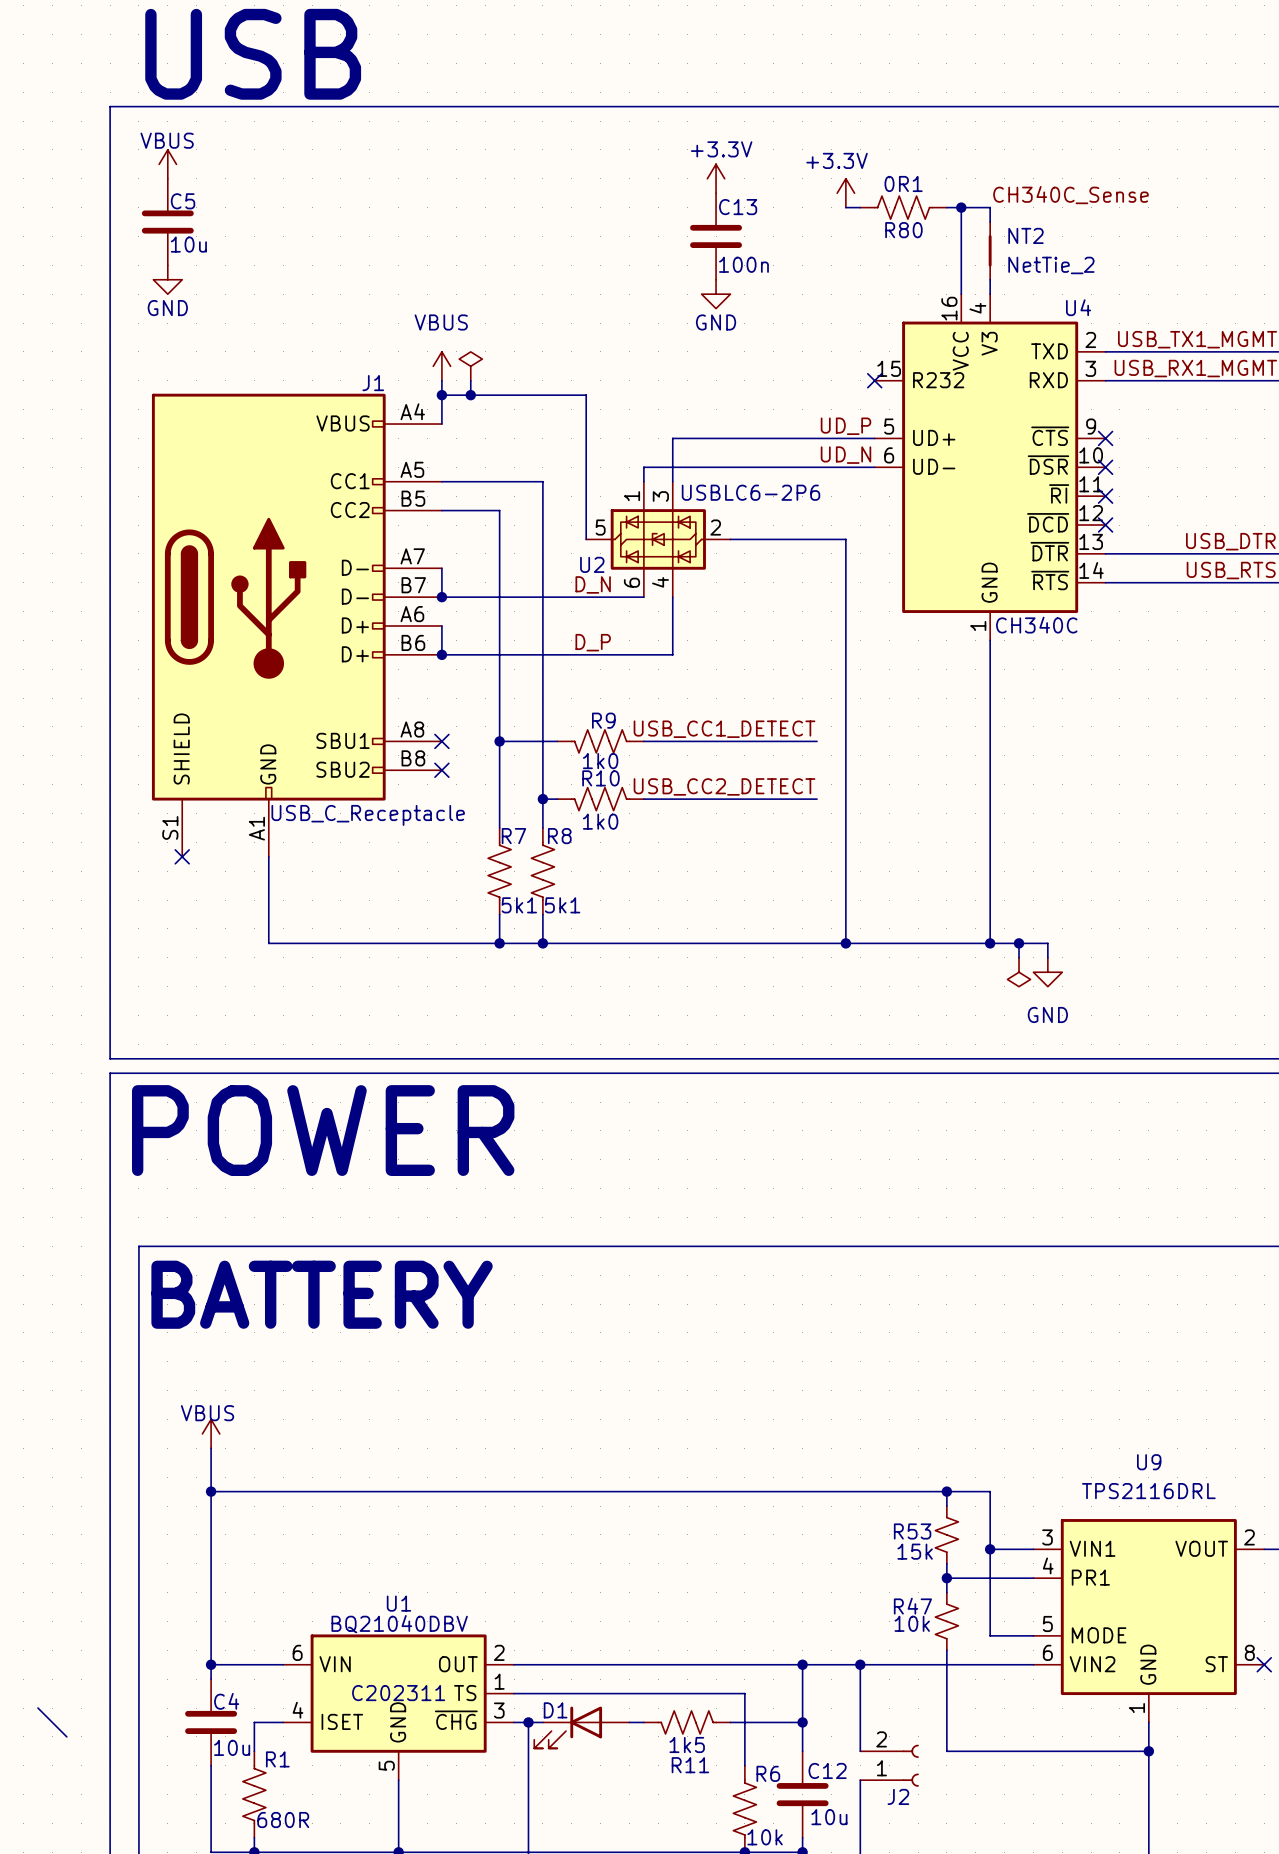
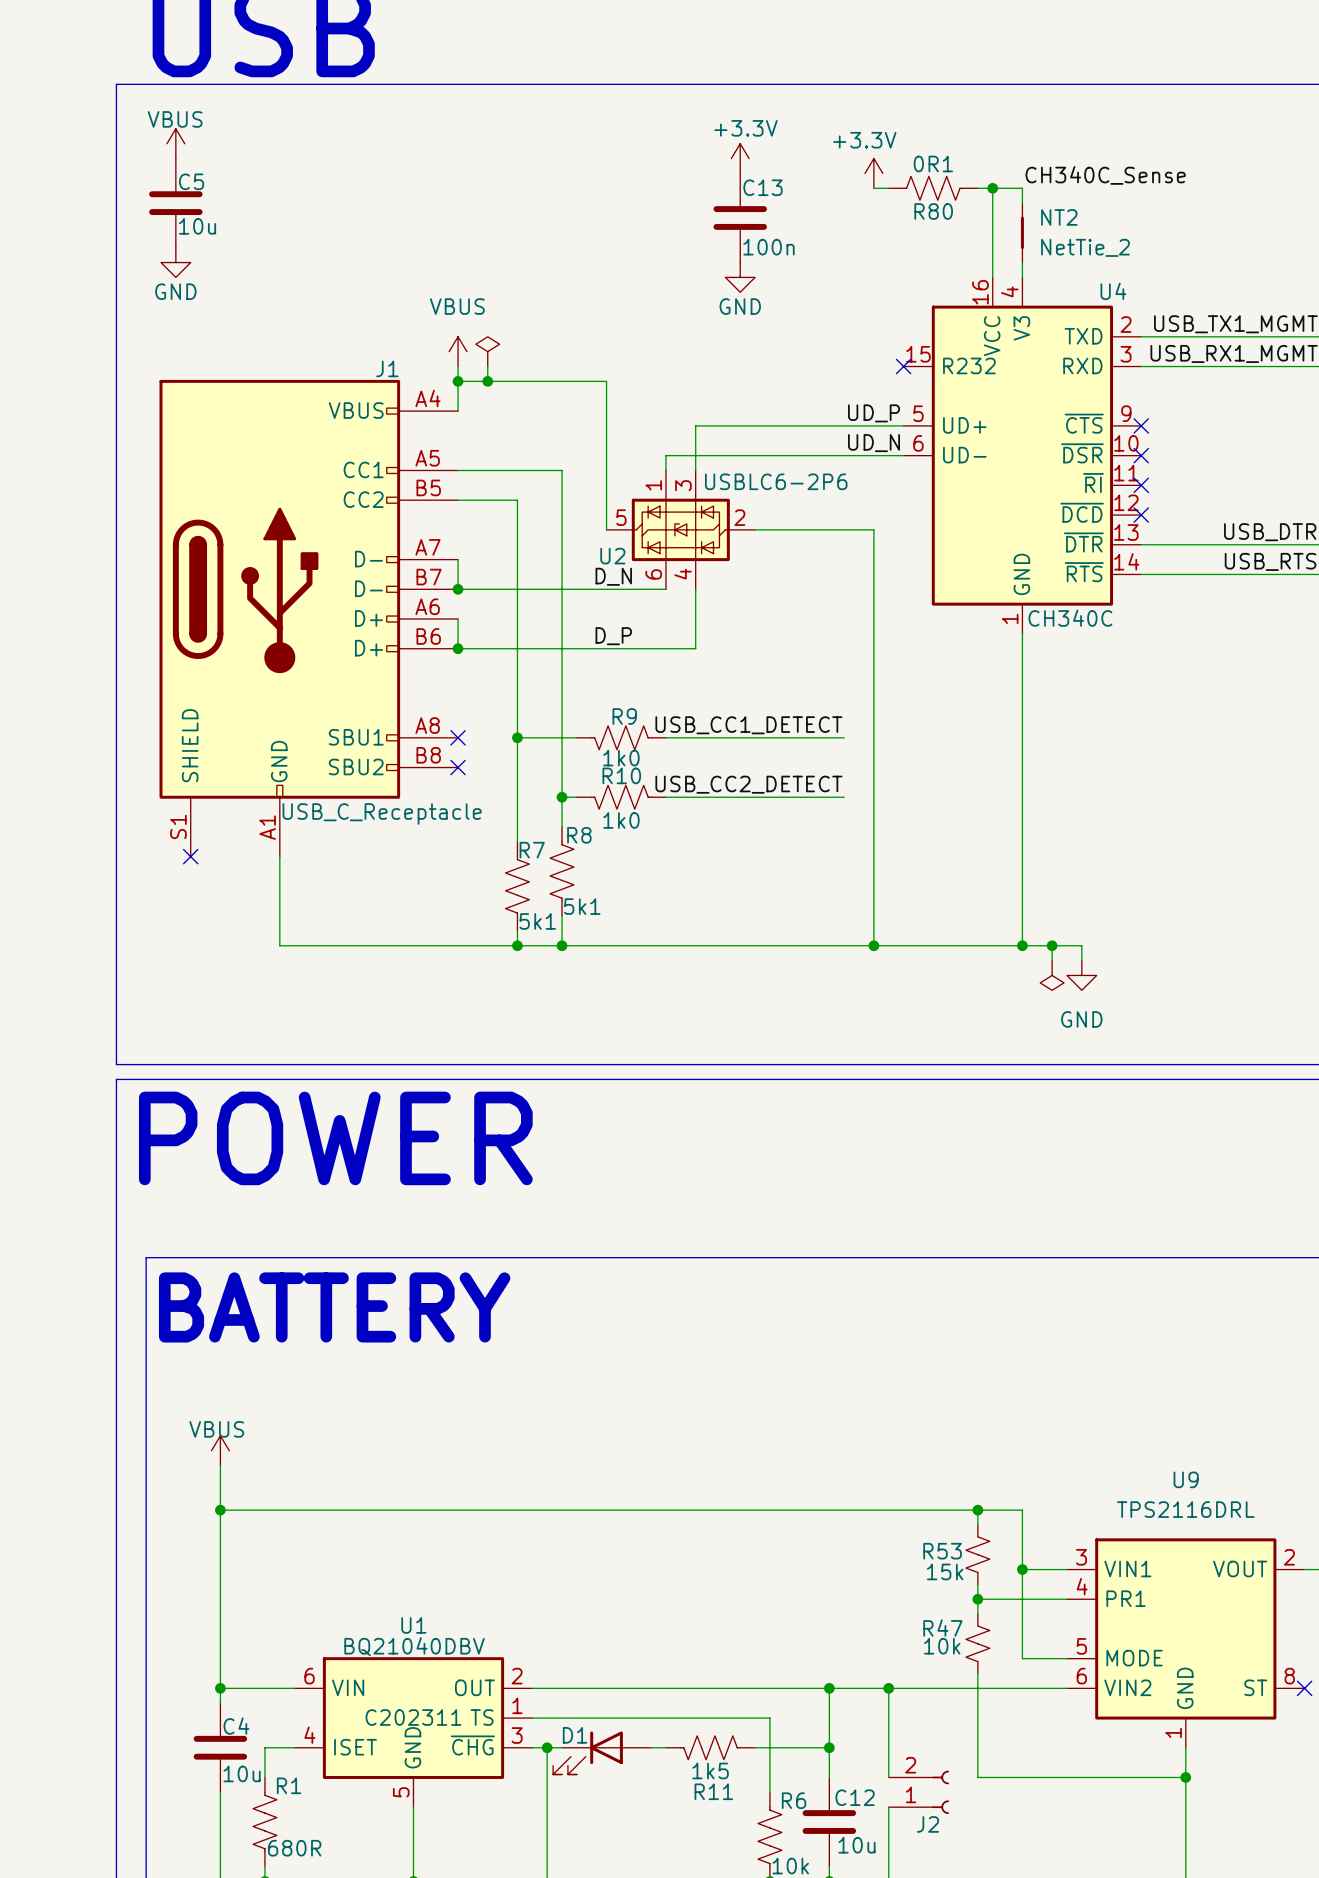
R7 position: (499, 871) -> (517, 886)
wire: (37, 1708) (66, 1736) -> none

